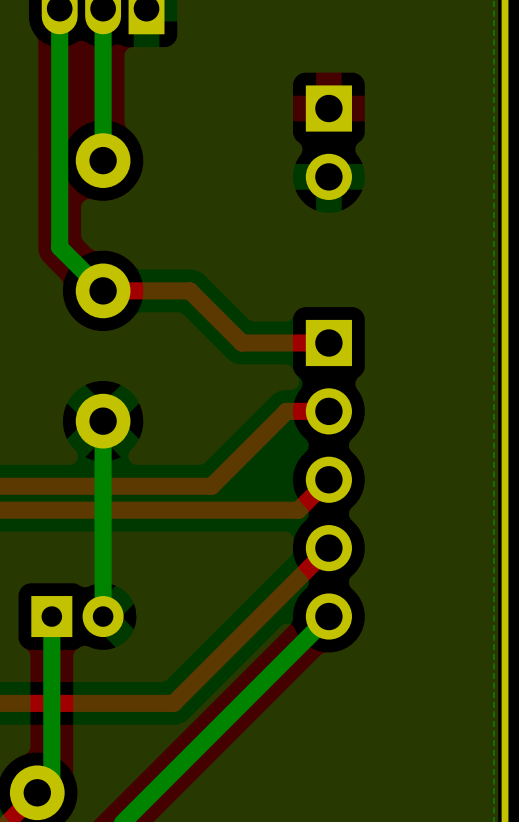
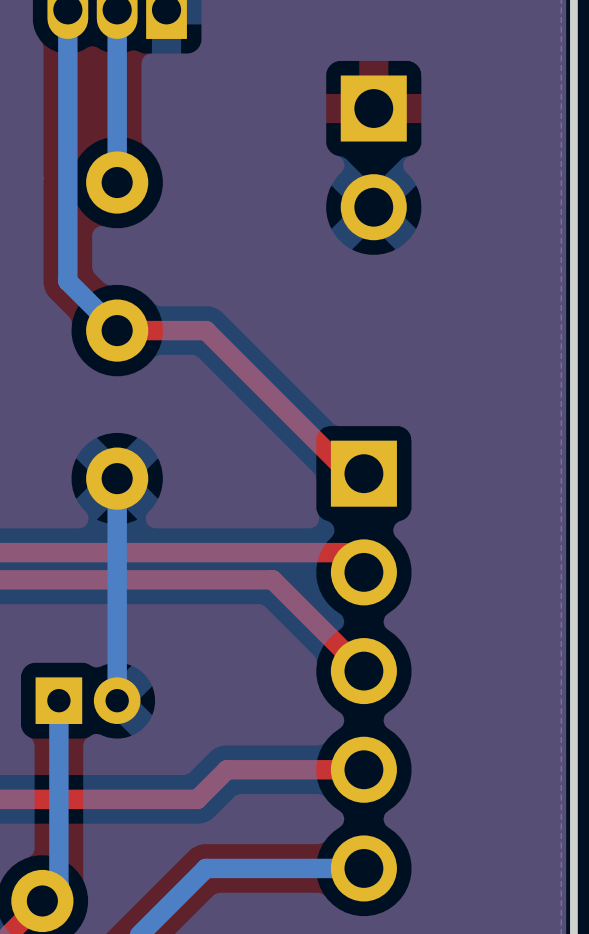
part footprint: [305, 85, 352, 200] -> [340, 75, 407, 241]
top track: (181, 290) (189, 290) (242, 342) (328, 342) -> (206, 330) (349, 473) (363, 473)
top track: (328, 411) (286, 411) (211, 486) -> (363, 572) (344, 552) (240, 552)
top track: (328, 479) (298, 510) (239, 510) -> (363, 671) (272, 579)
part: (328, 479) -> none
top track: (328, 548) (199, 677) -> (363, 769) (226, 769)
part: none -> (363, 671)
bottom track: (328, 616) (181, 764) -> (363, 868) (205, 868)

